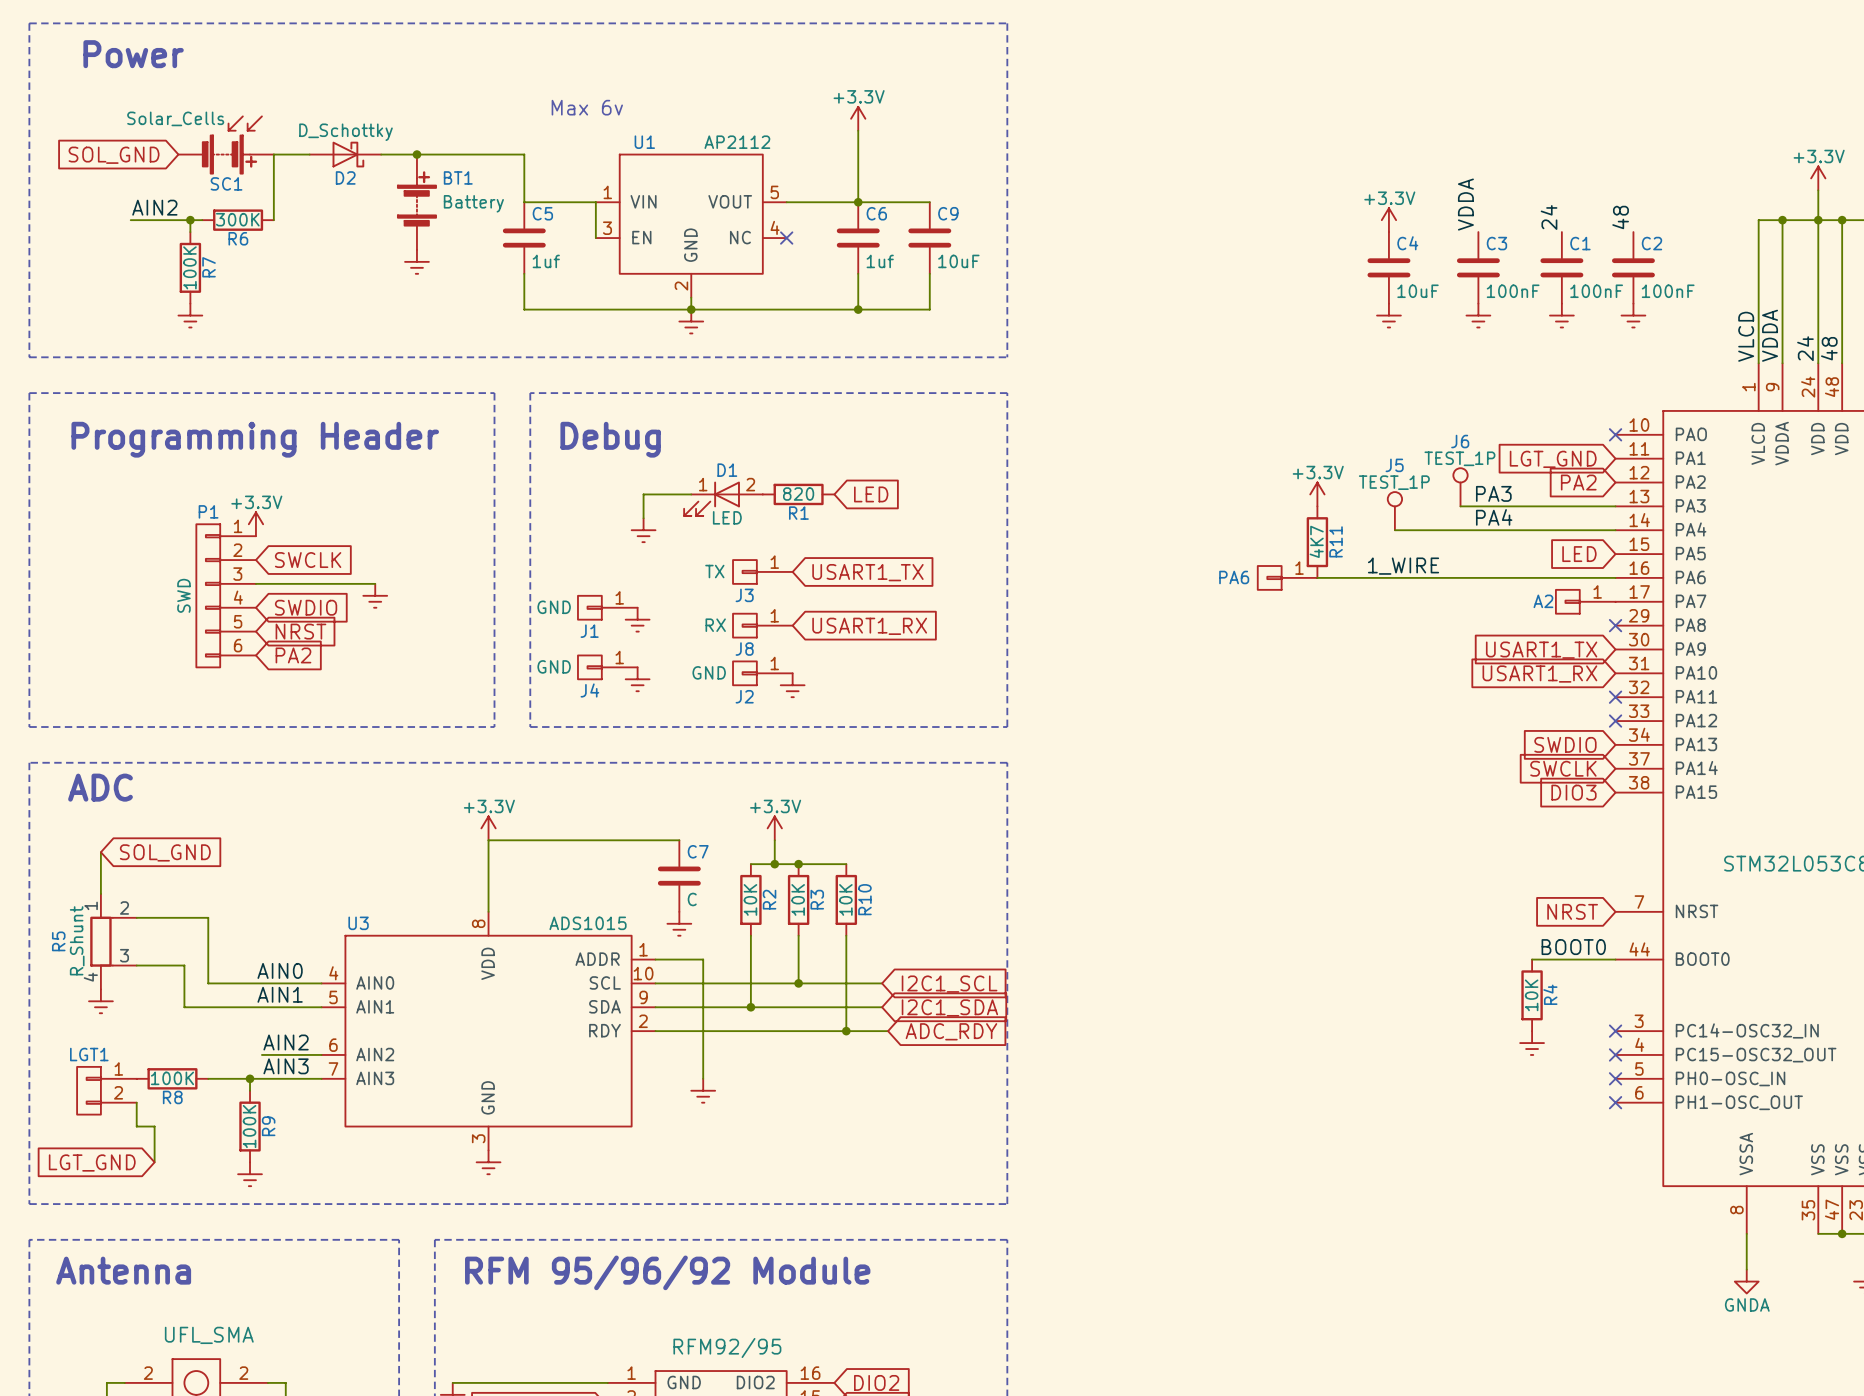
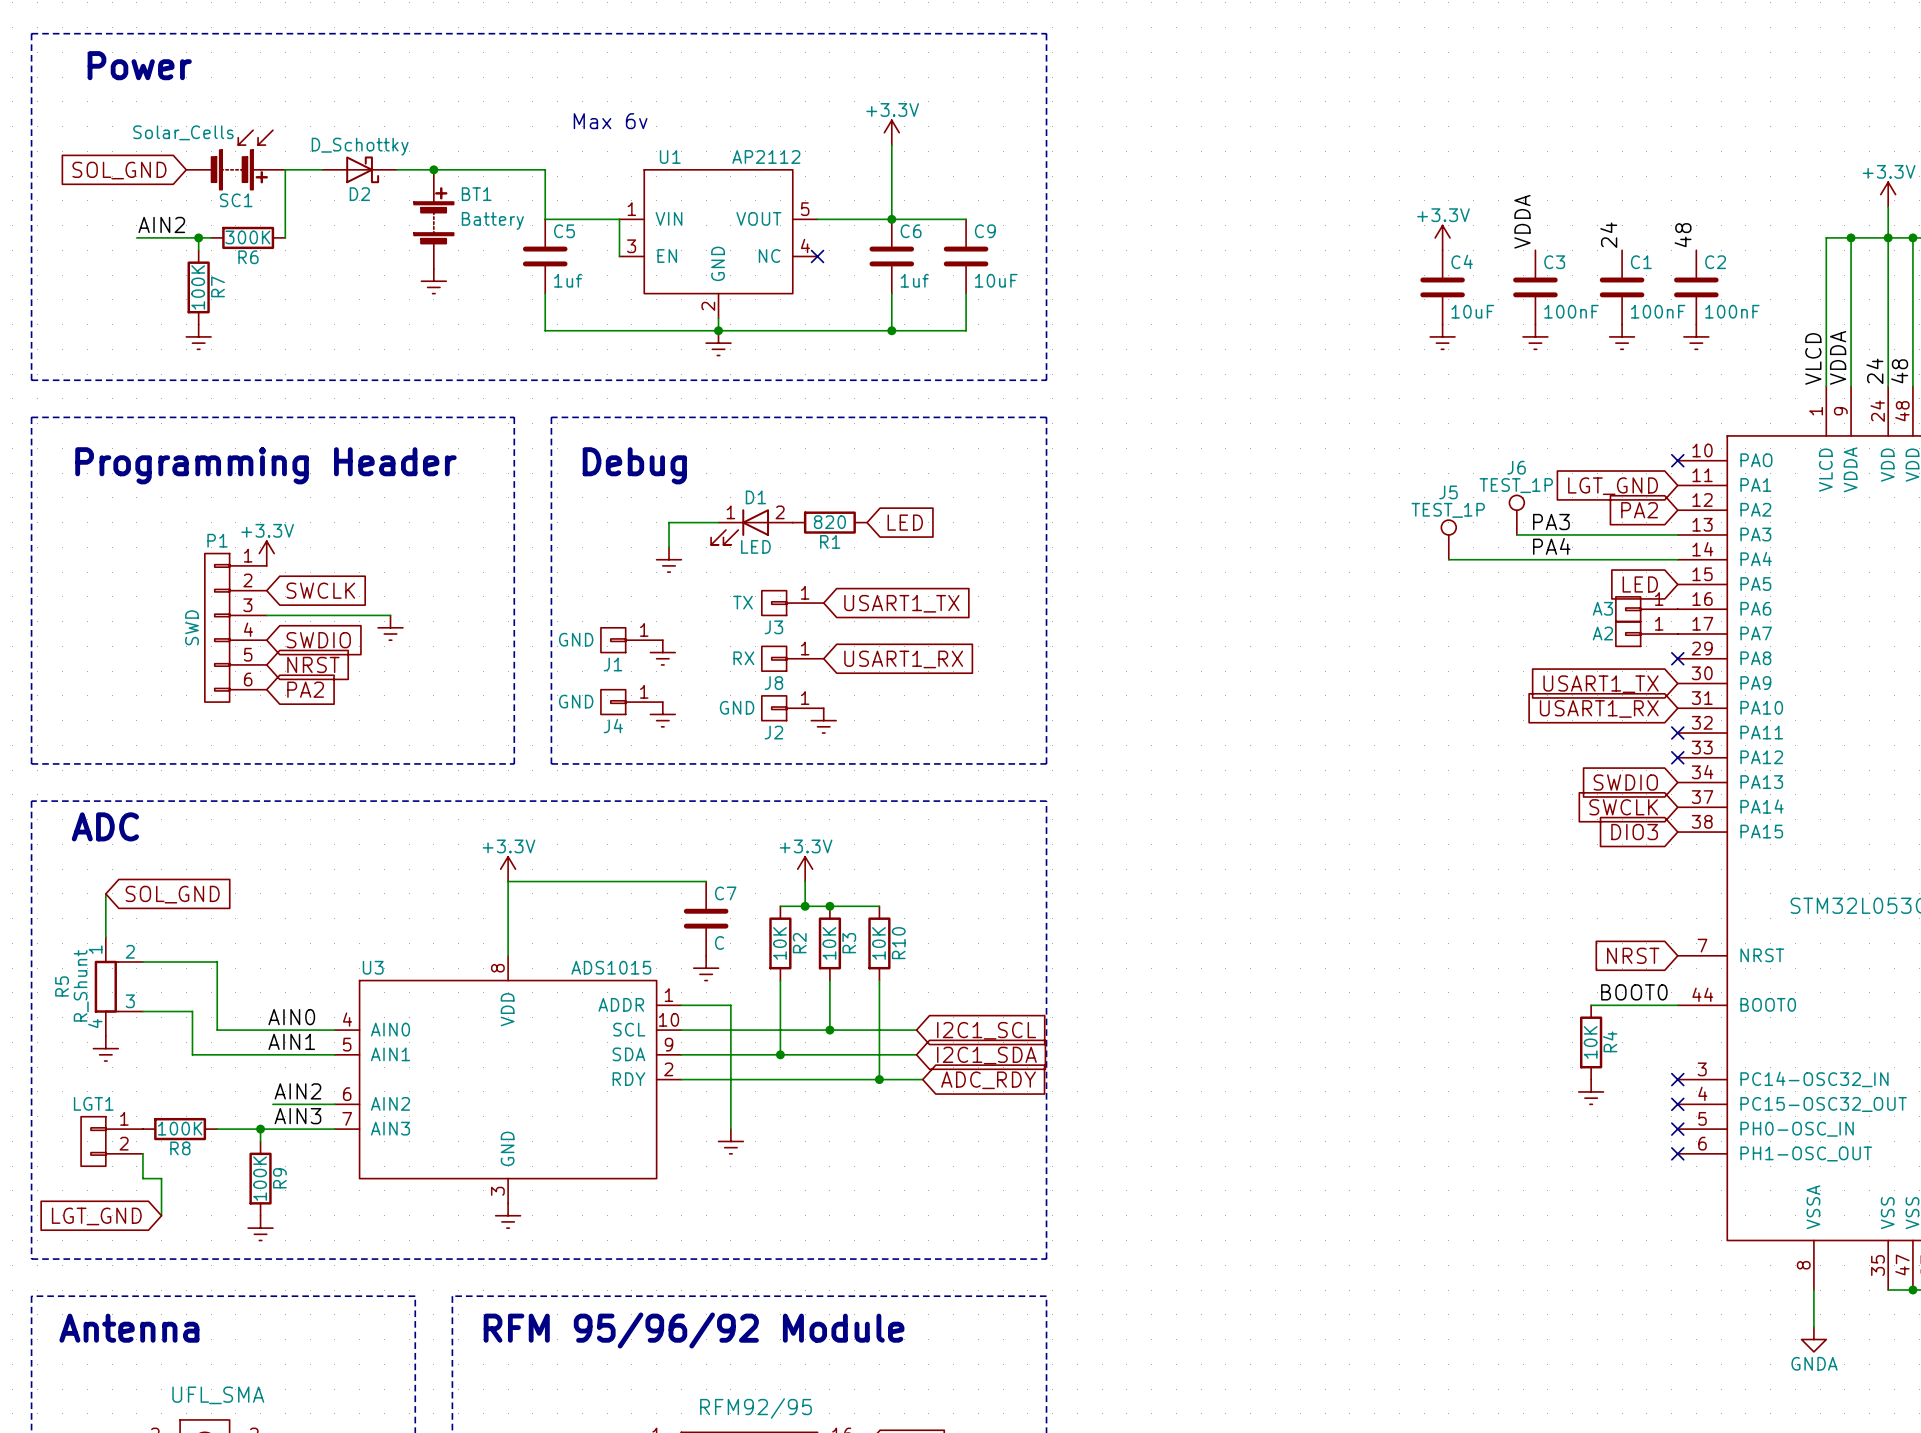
power symbol: +3.3V (1317, 494) -> none
R11: 4K7 (1317, 542) -> none
label: 1_WIRE (1403, 566) -> none
PA6: (1287, 577) -> none
wire: (1317, 577) (1615, 577) -> none
A3: none -> (1646, 609)

